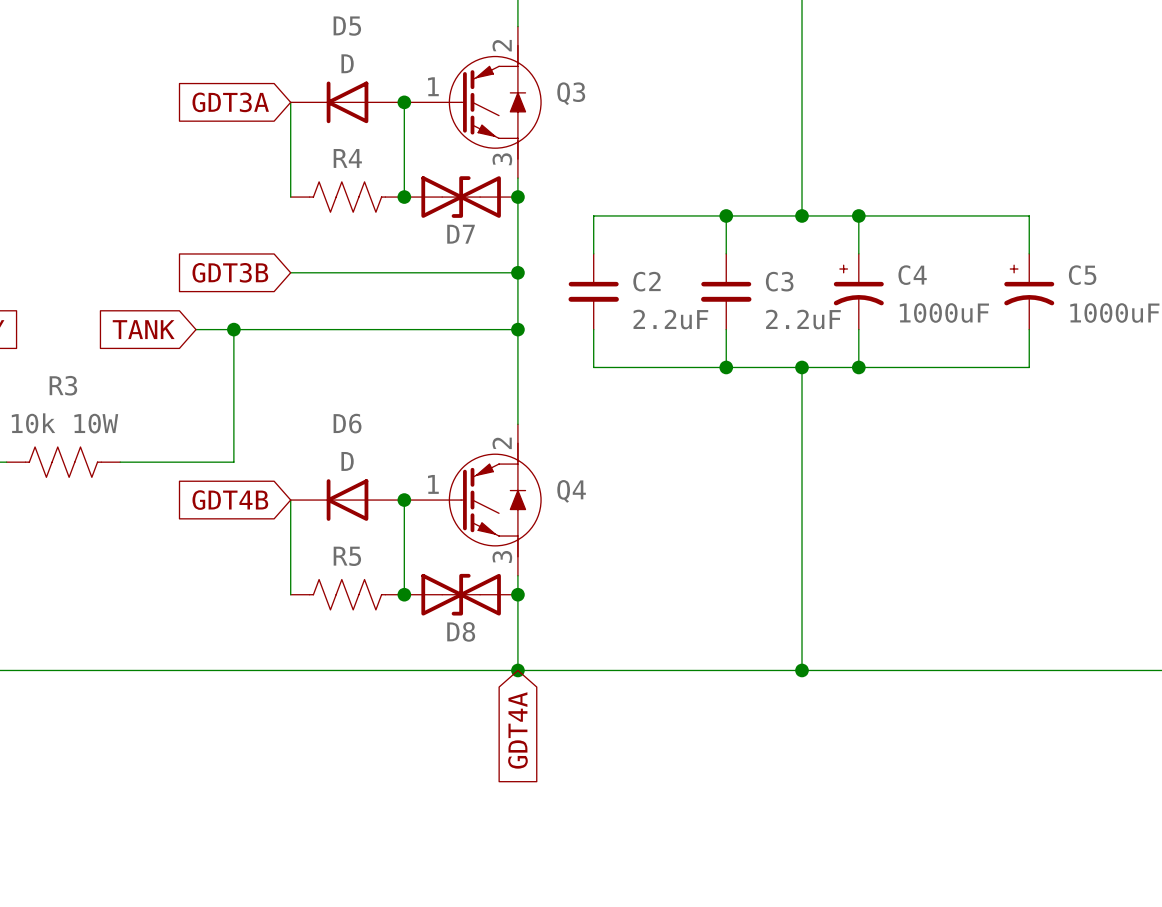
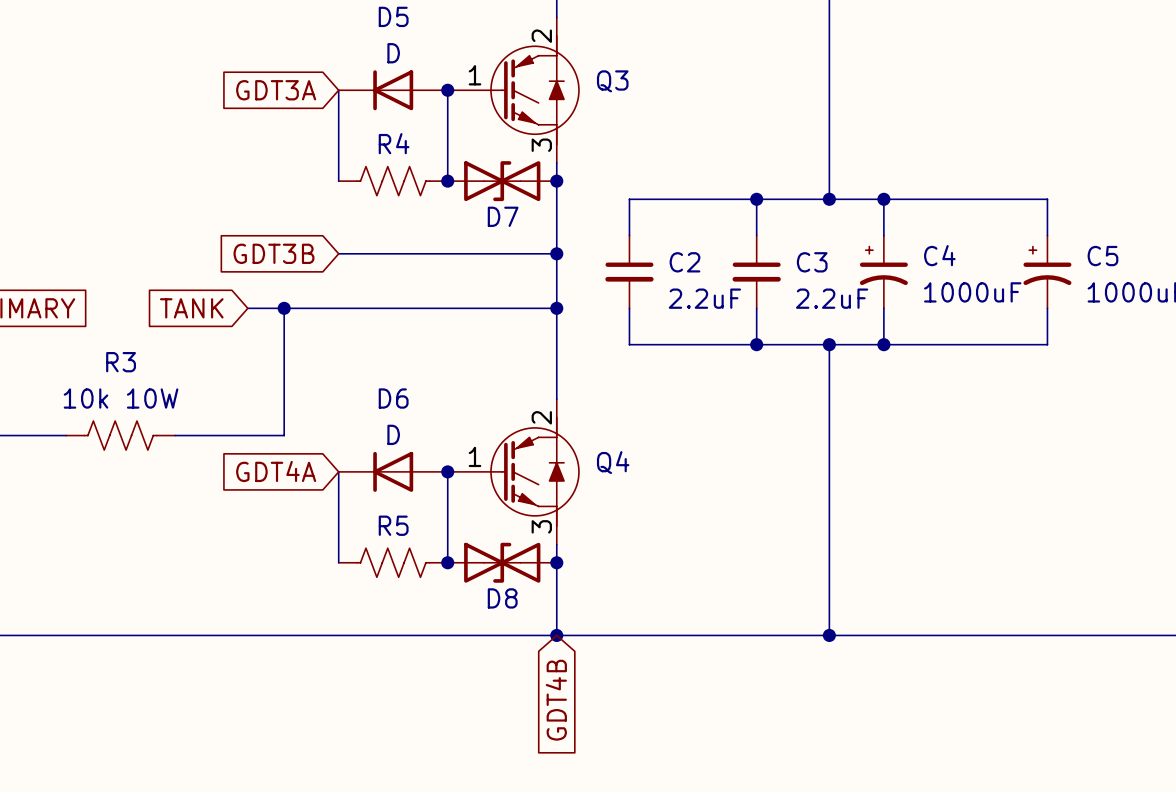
global label: GDT4B (230, 500) -> GDT4A (276, 471)
global label: GDT4A (517, 730) -> GDT4B (556, 700)

